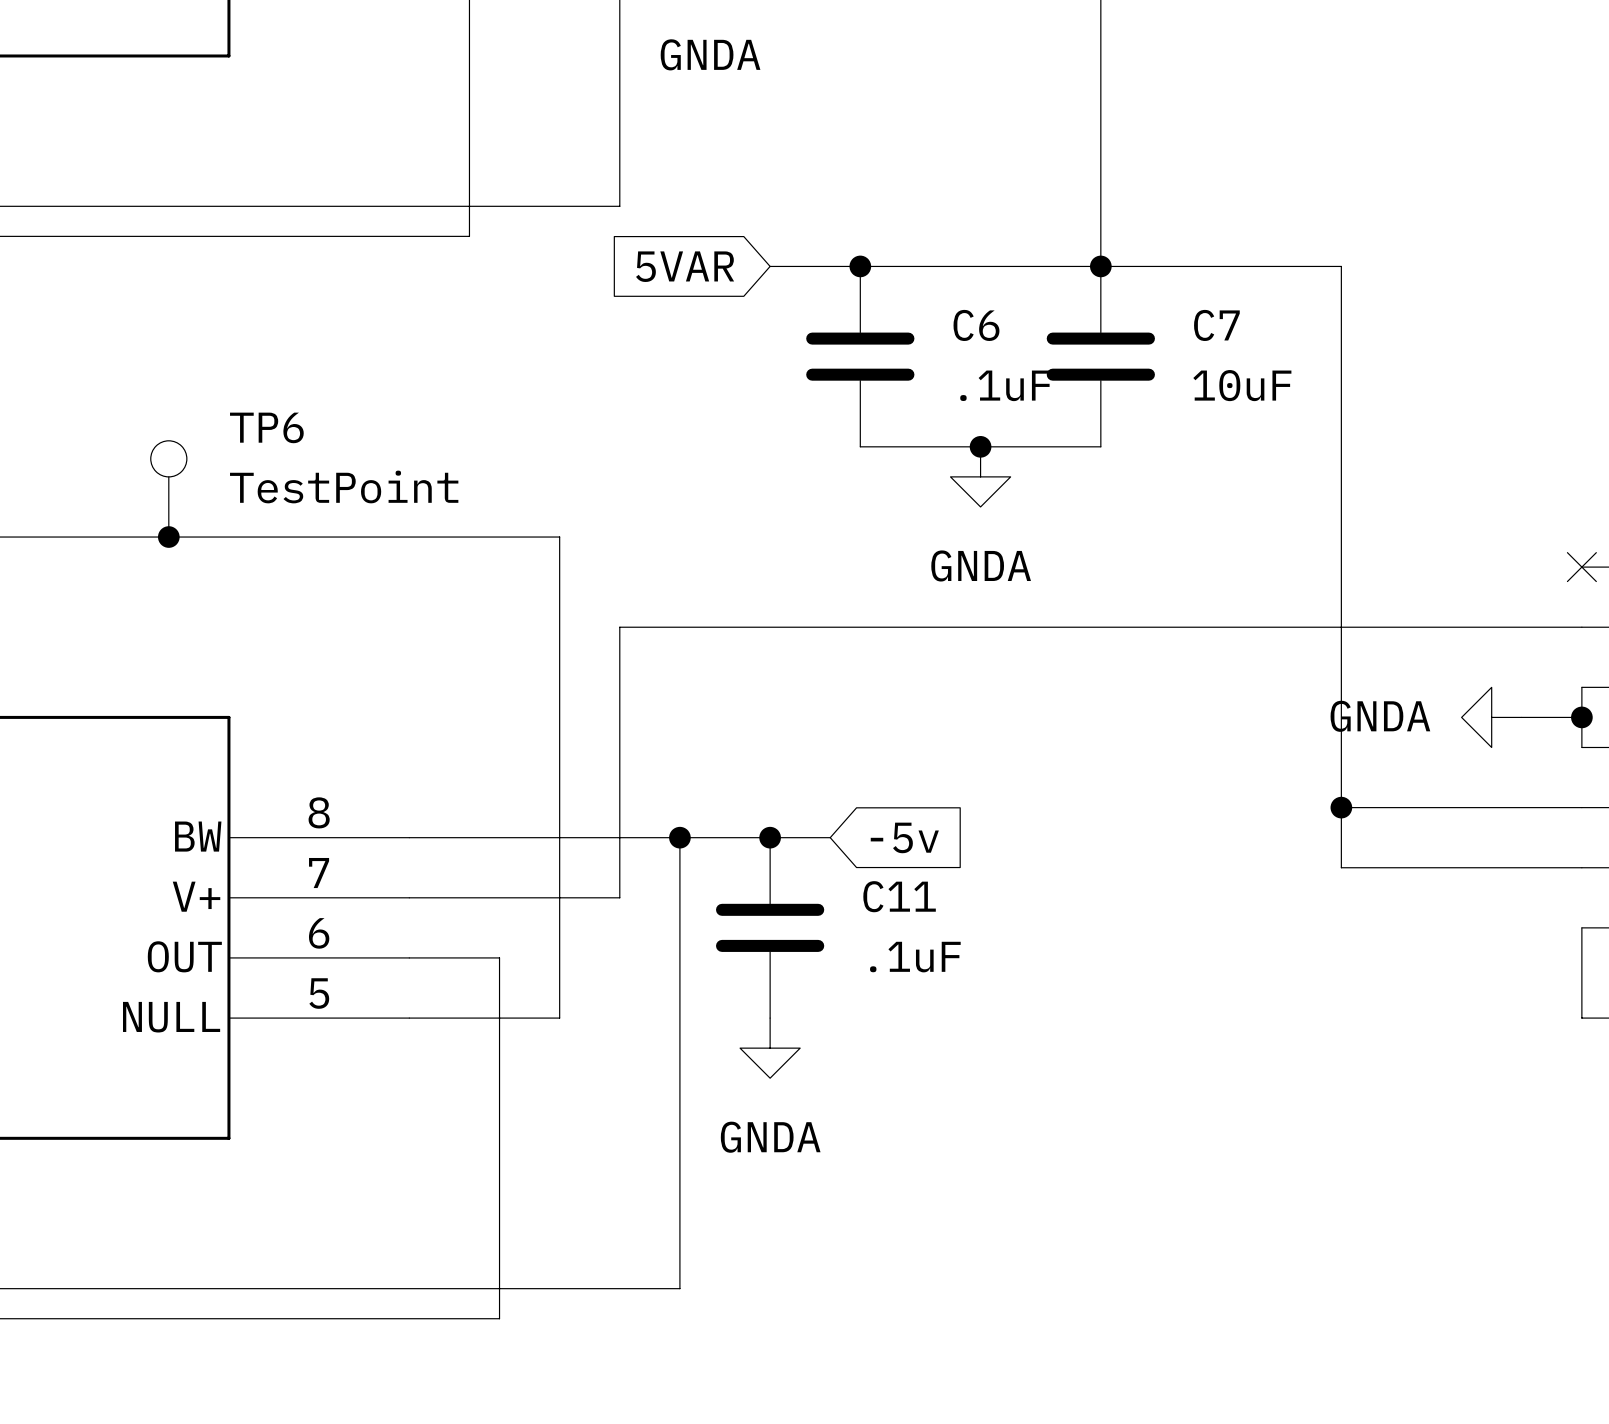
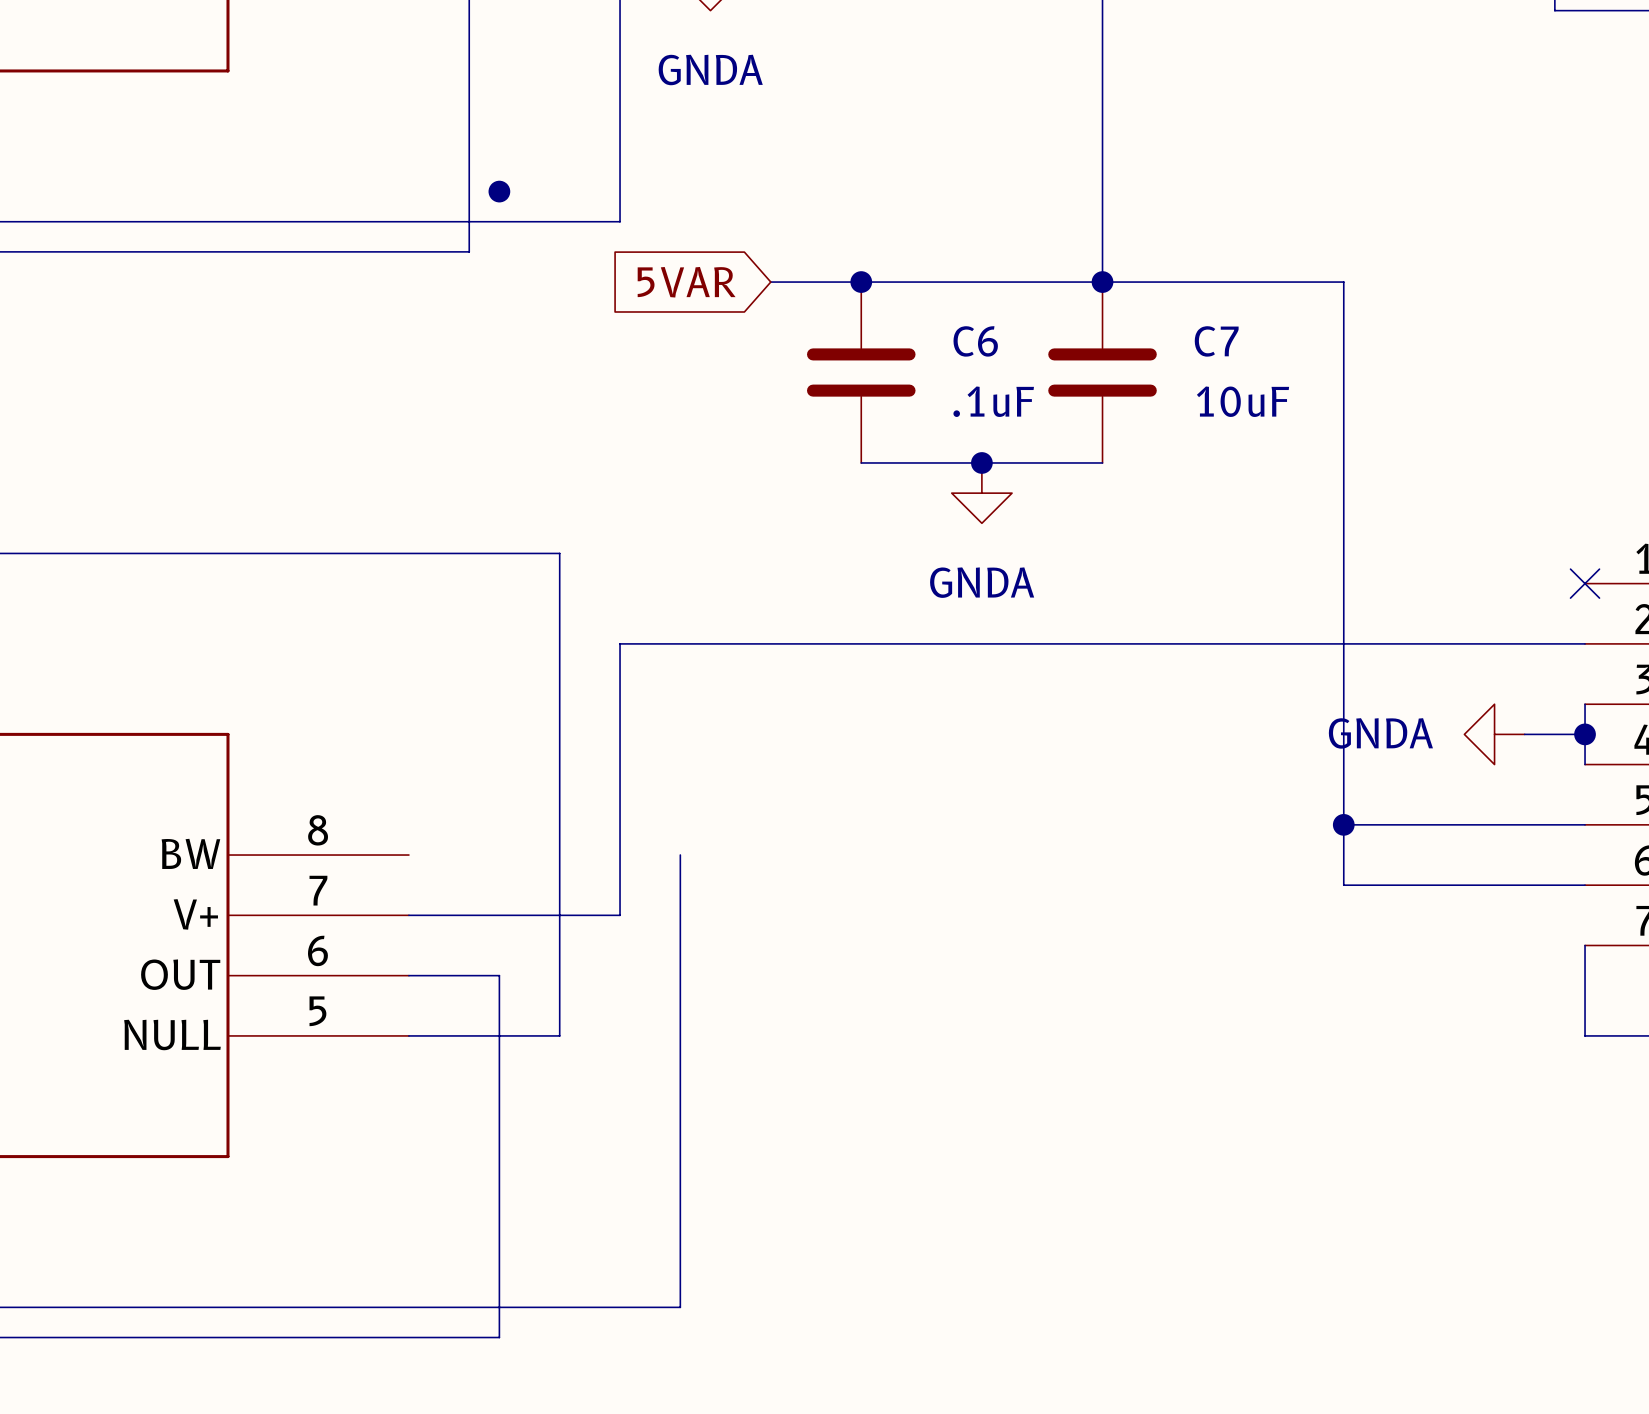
junction: none -> (499, 191)
TP6: TestPoint (168, 488) -> none
junction: (168, 537) -> none
wire: (409, 837) (830, 837) -> none
junction: (679, 837) -> none
junction: (770, 837) -> none
global label: -5v (904, 837) -> none
C11: .1uF (770, 927) -> none
power symbol: GNDA (770, 1048) -> none

